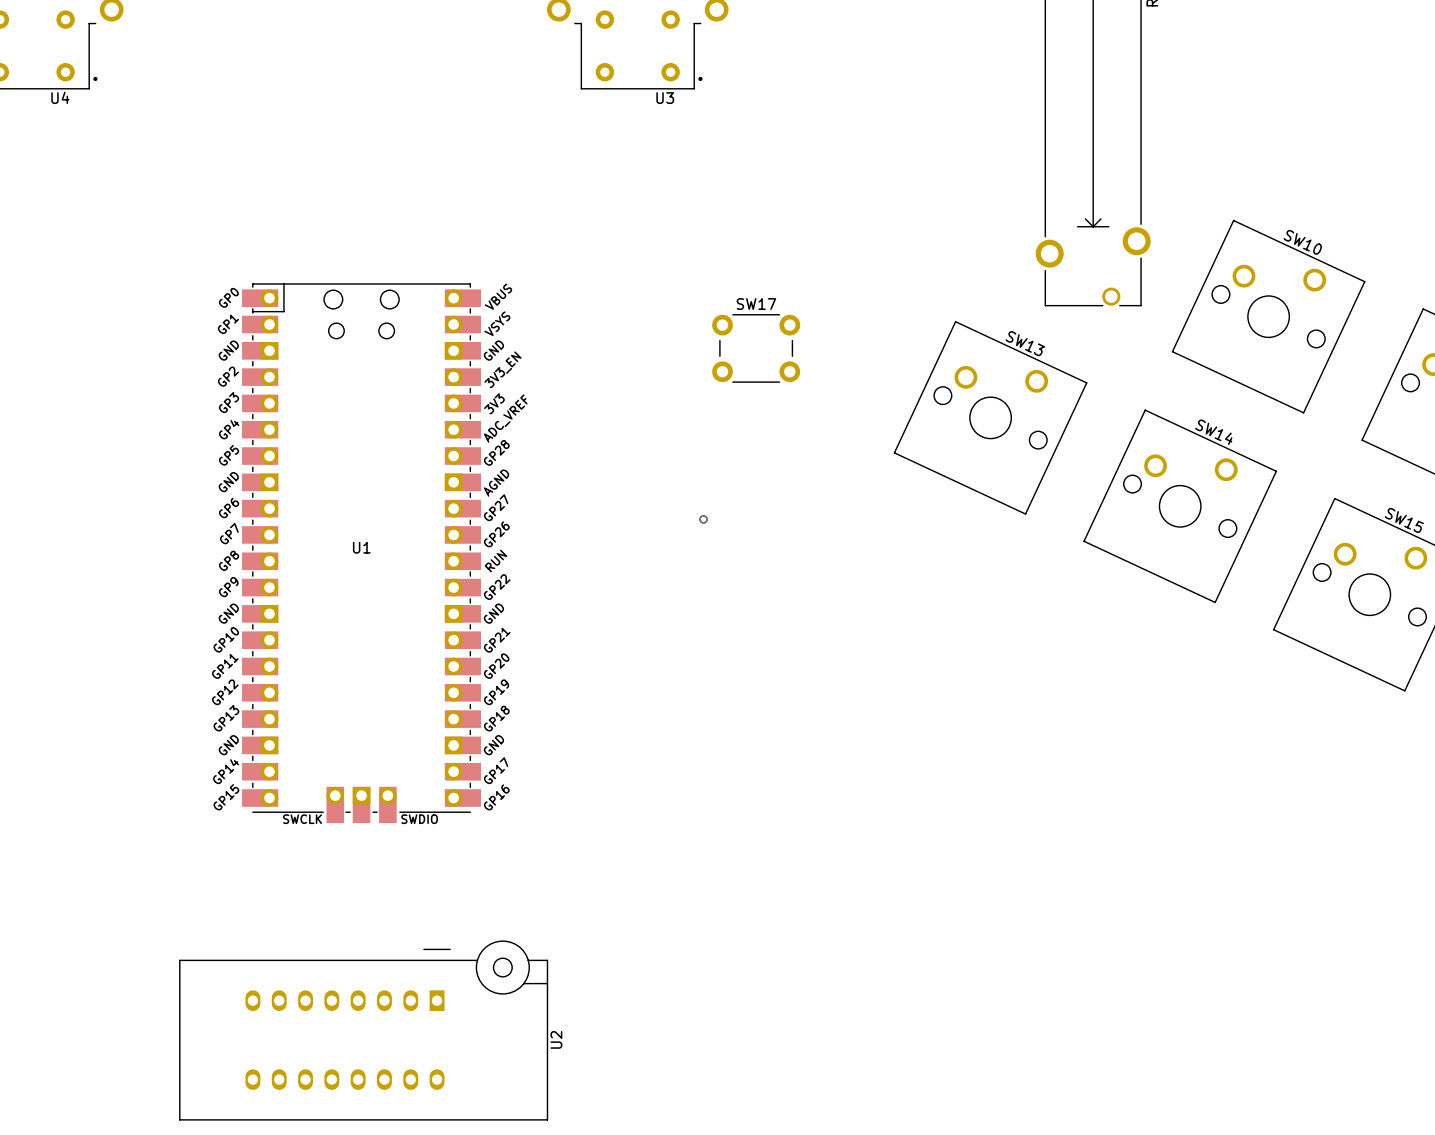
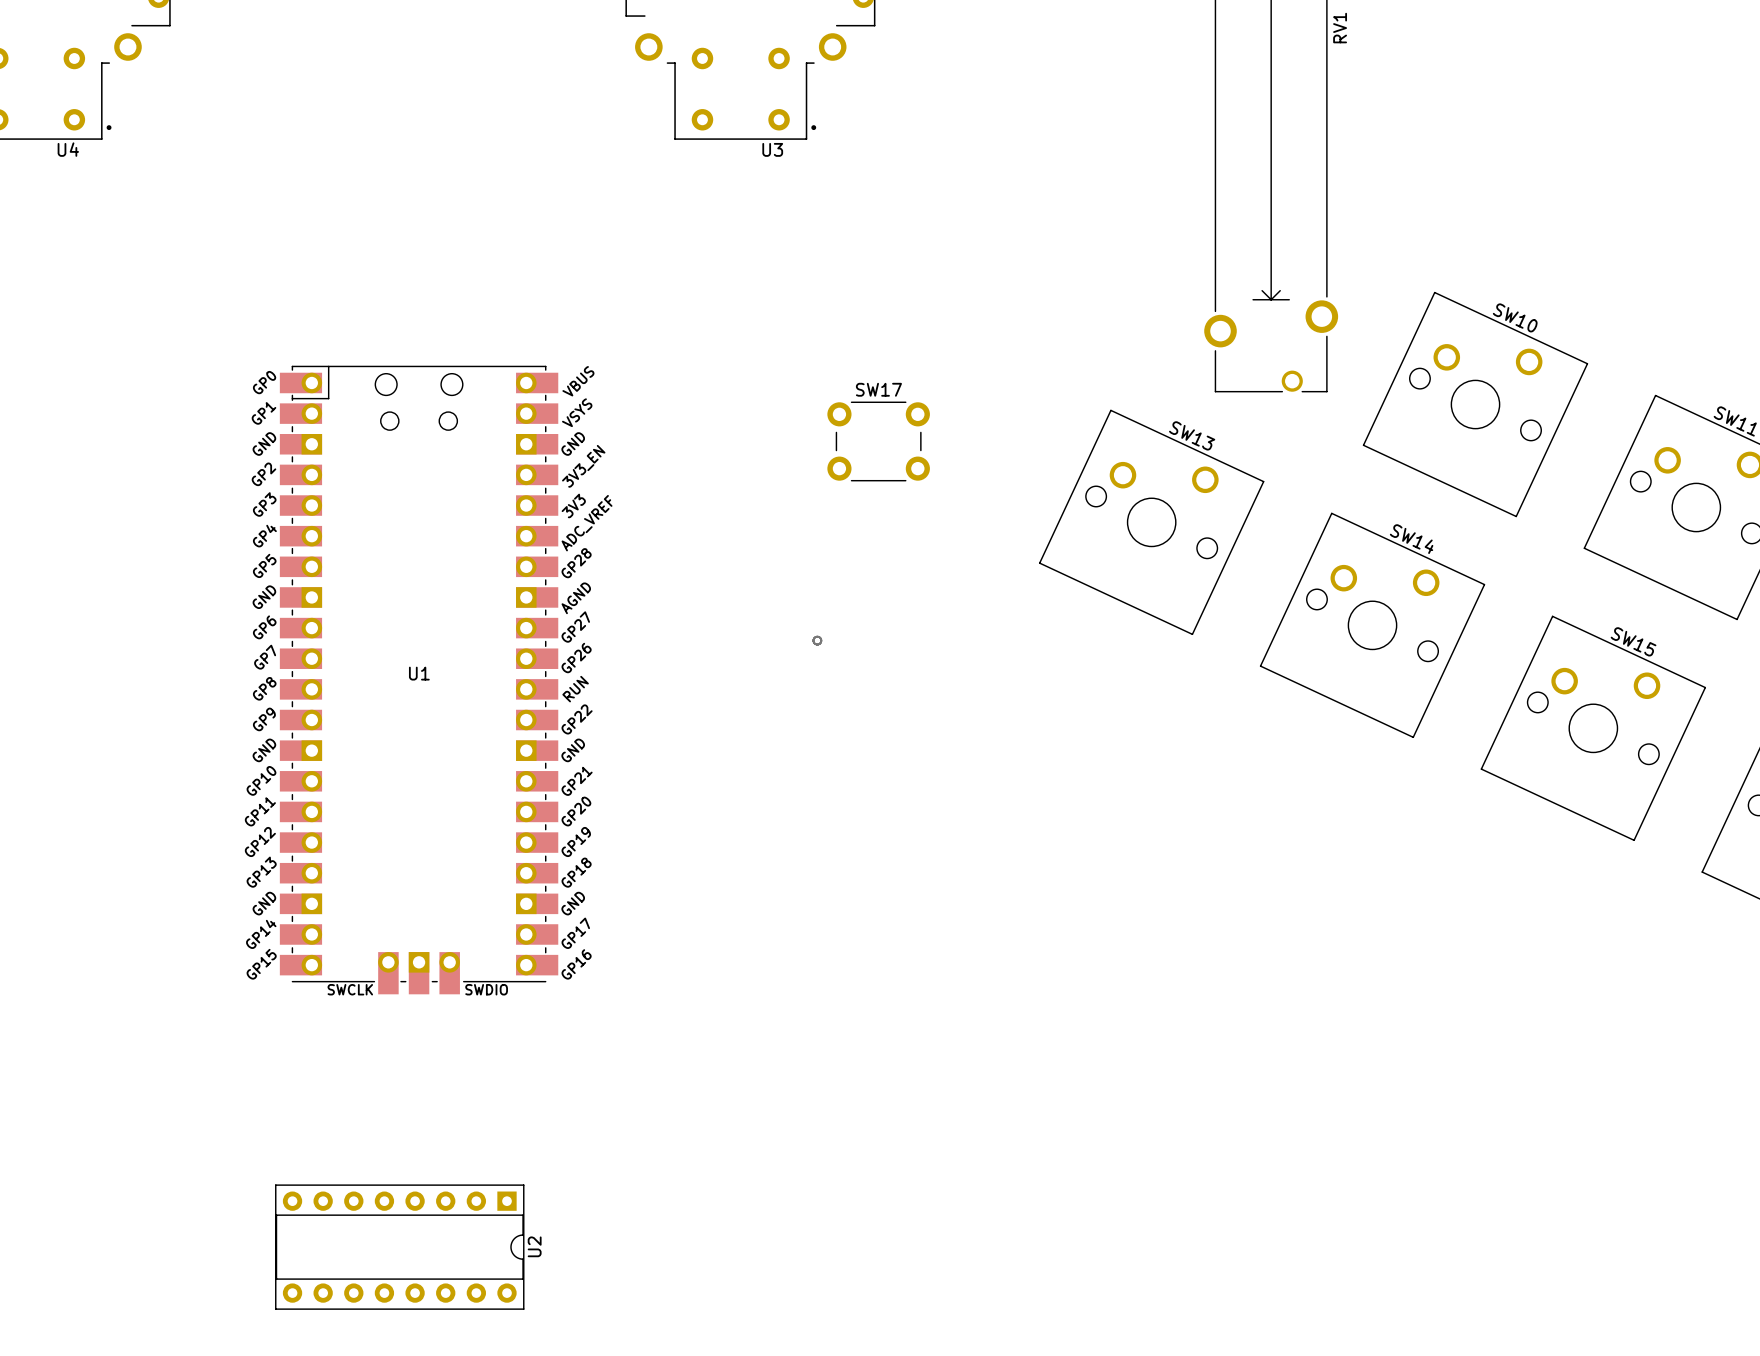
U2 footprint: [179, 940, 549, 1121] -> [275, 1184, 525, 1310]
U2 name position: U2 (556, 1039) -> U2 (534, 1246)

